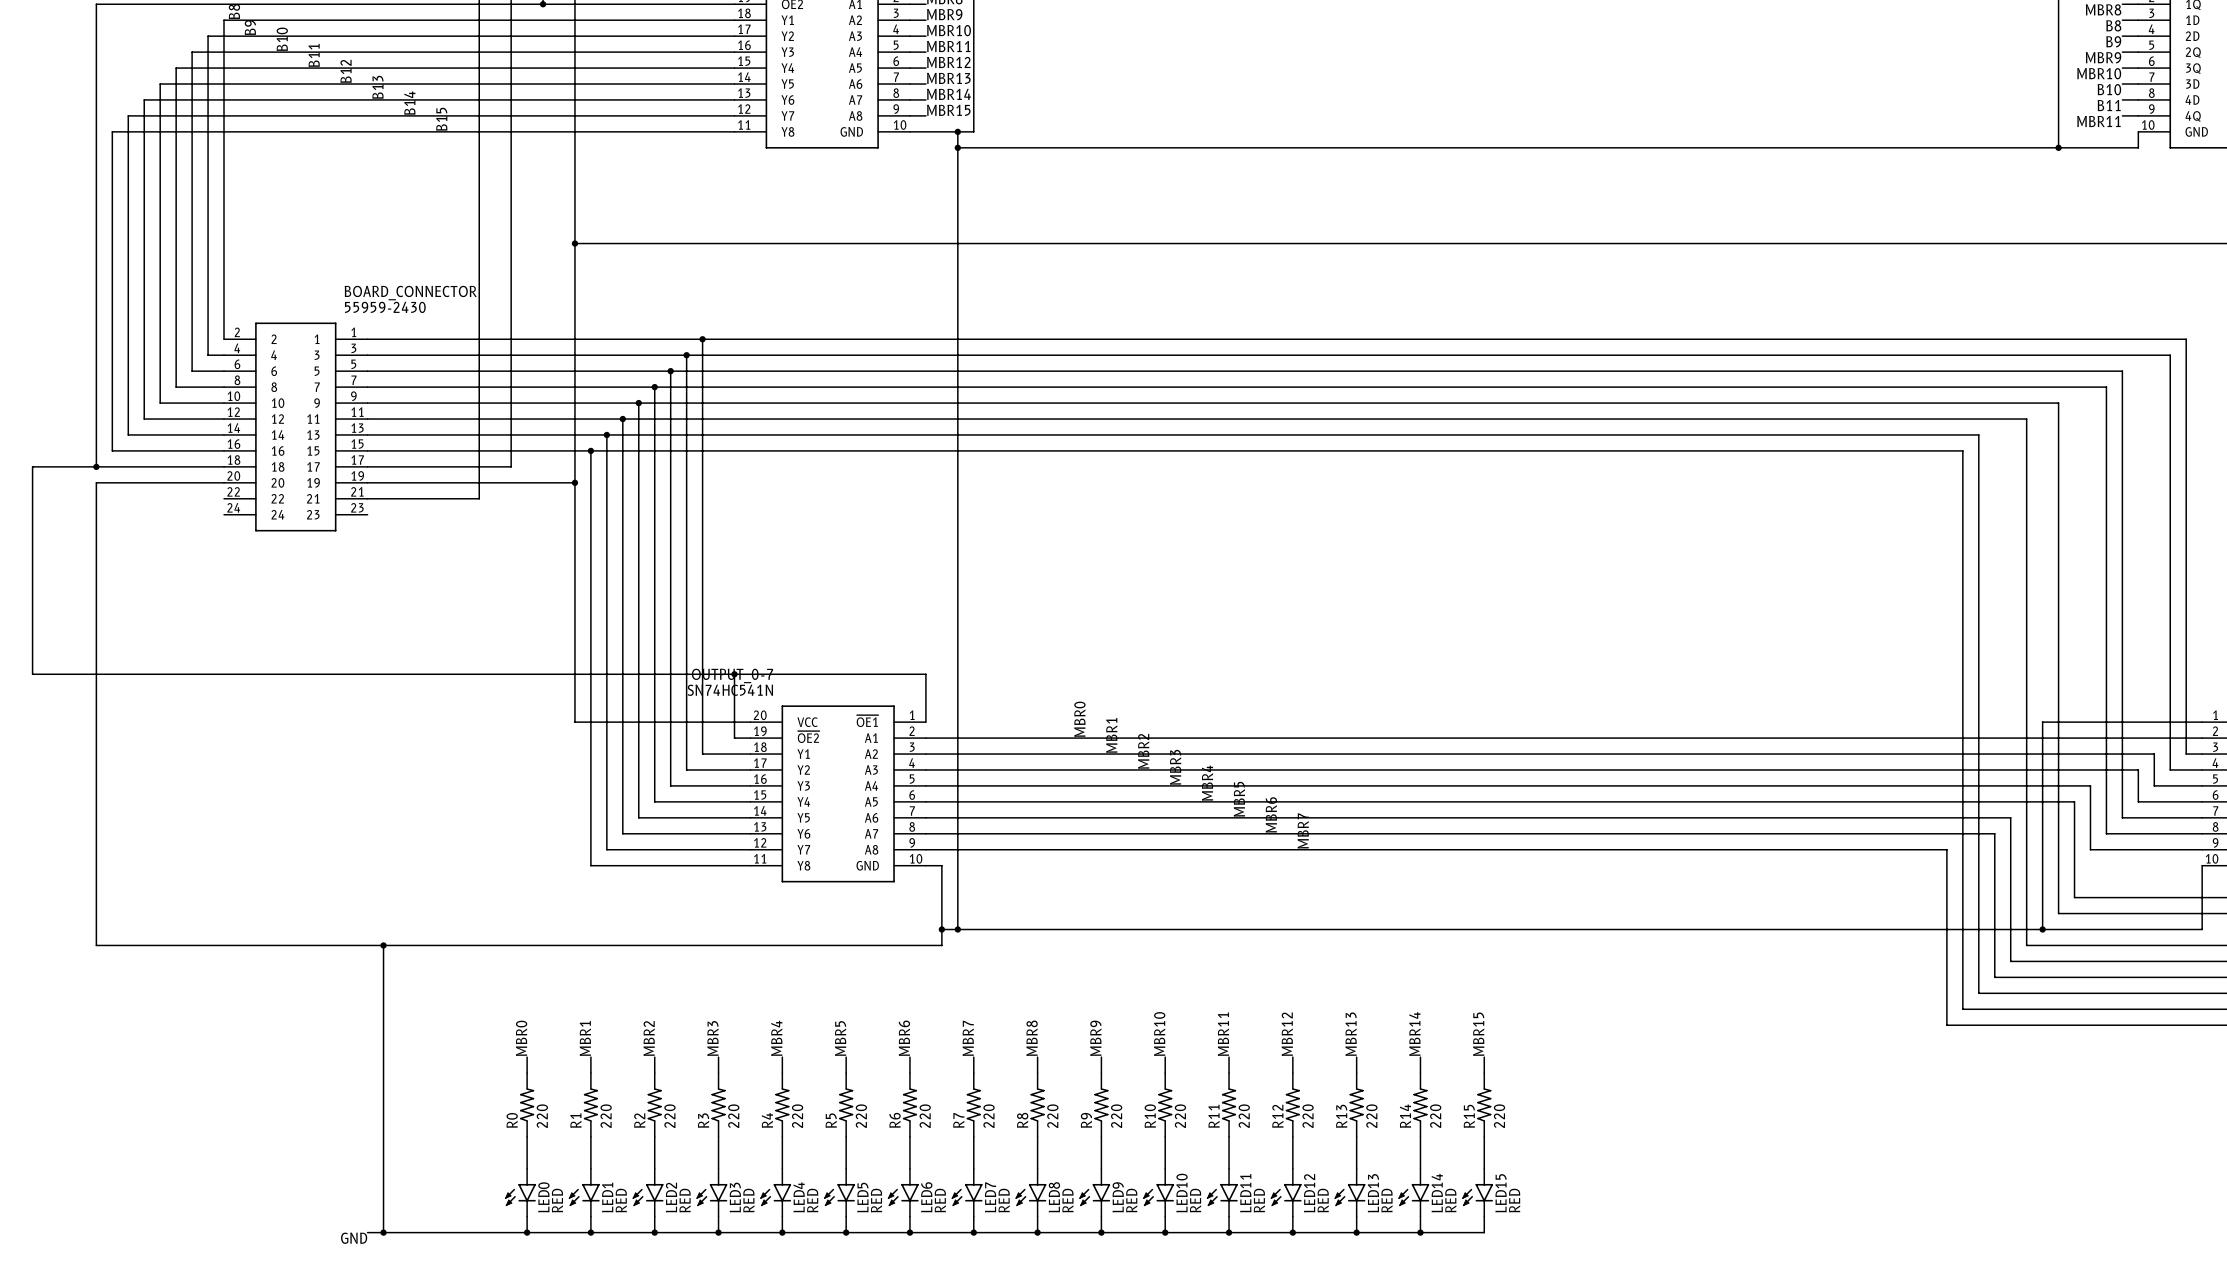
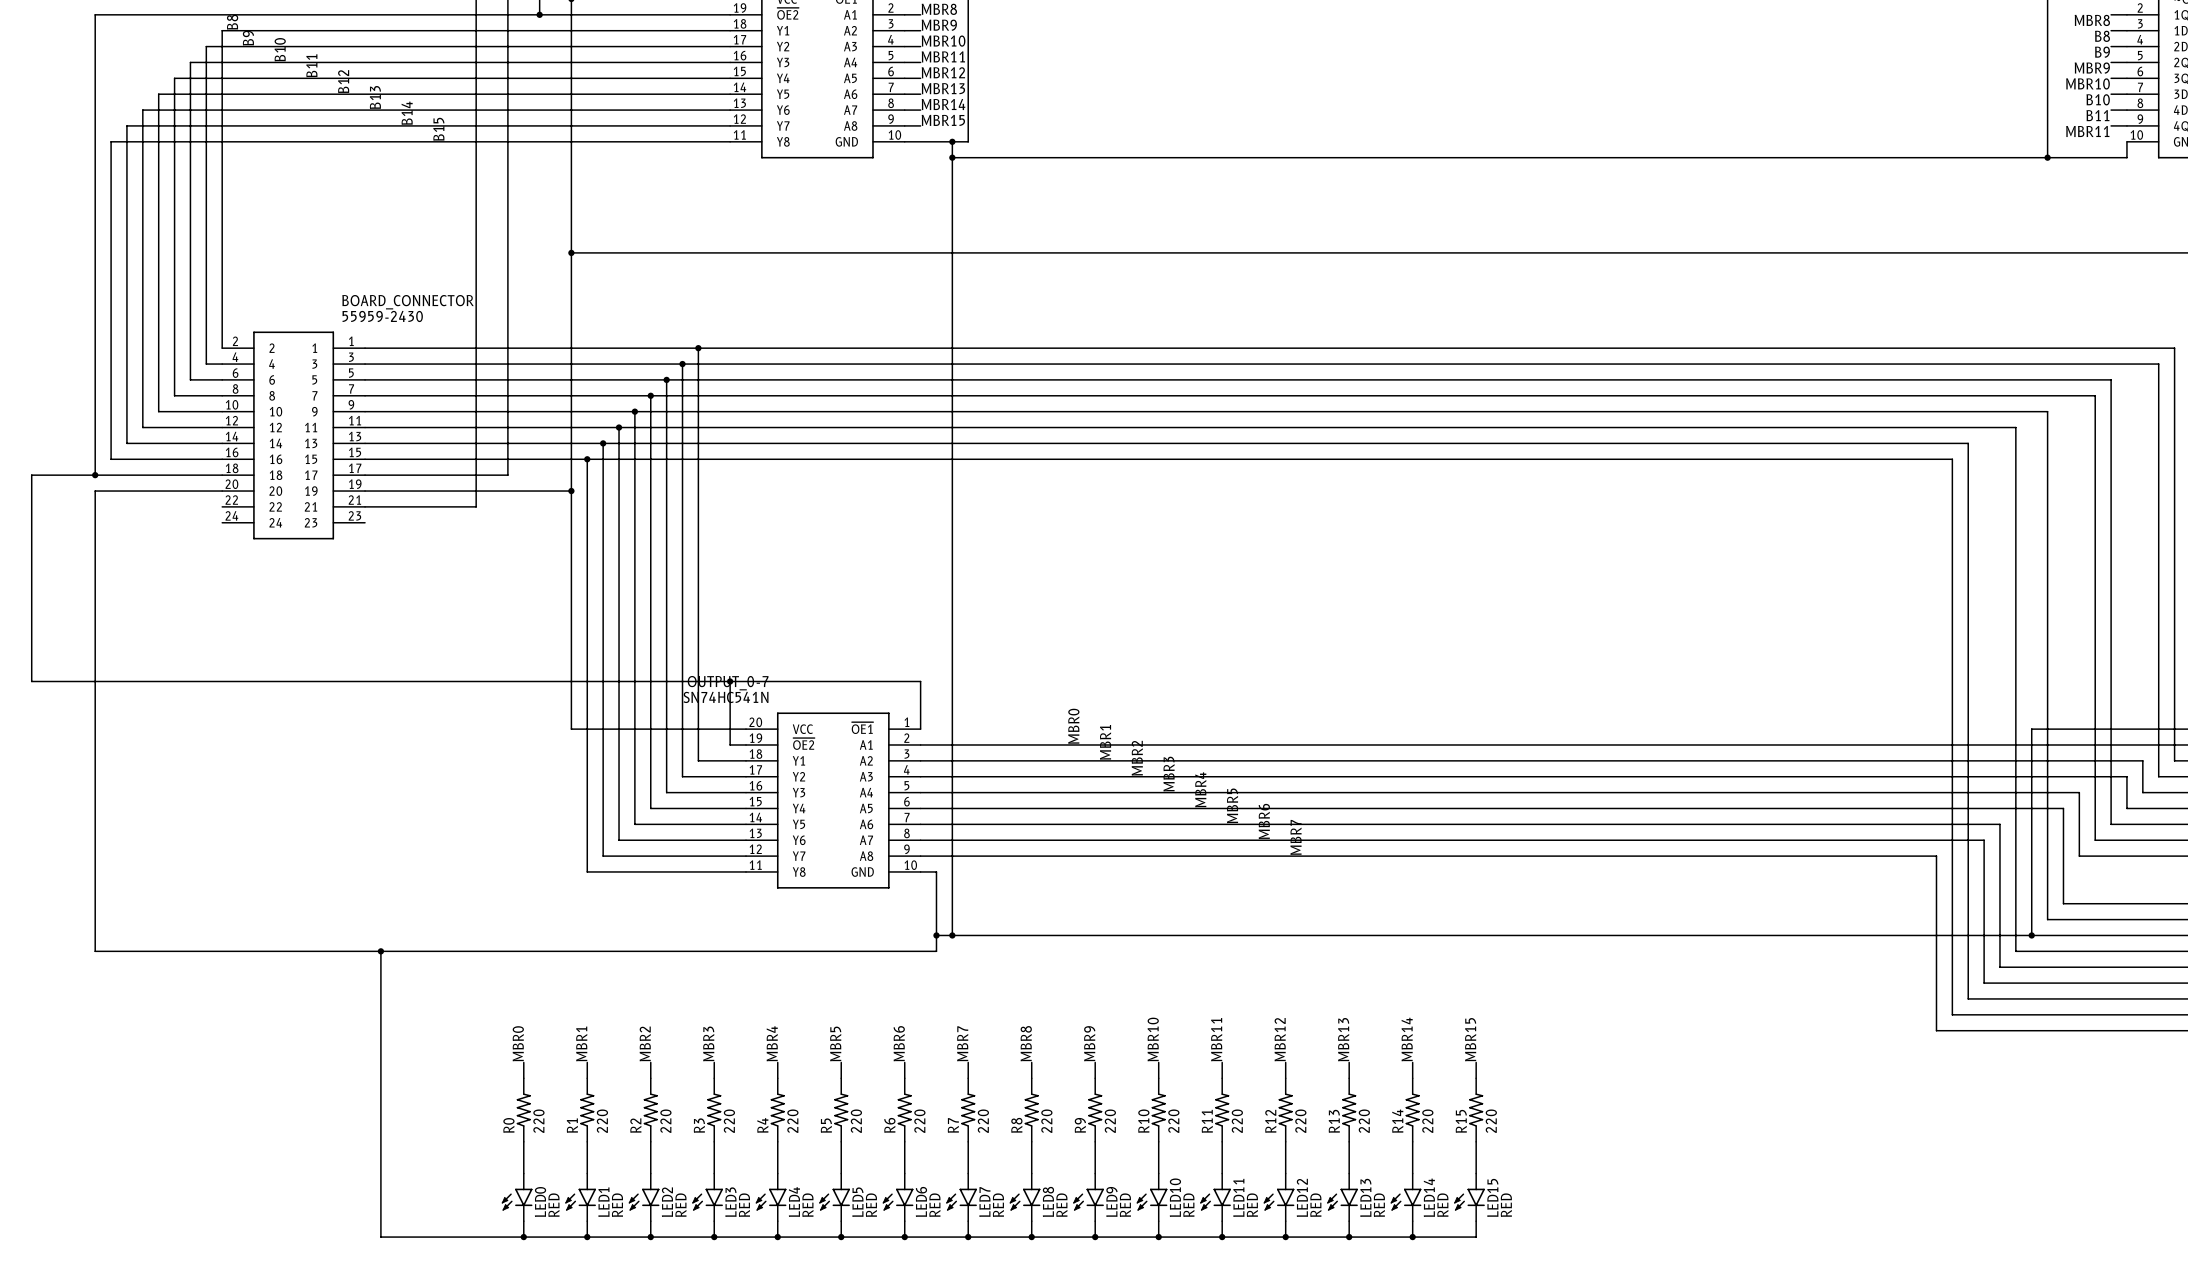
wire: (367, 1232) (383, 1232) -> none
junction: (383, 1232) -> none
label: GND (354, 1238) -> none

